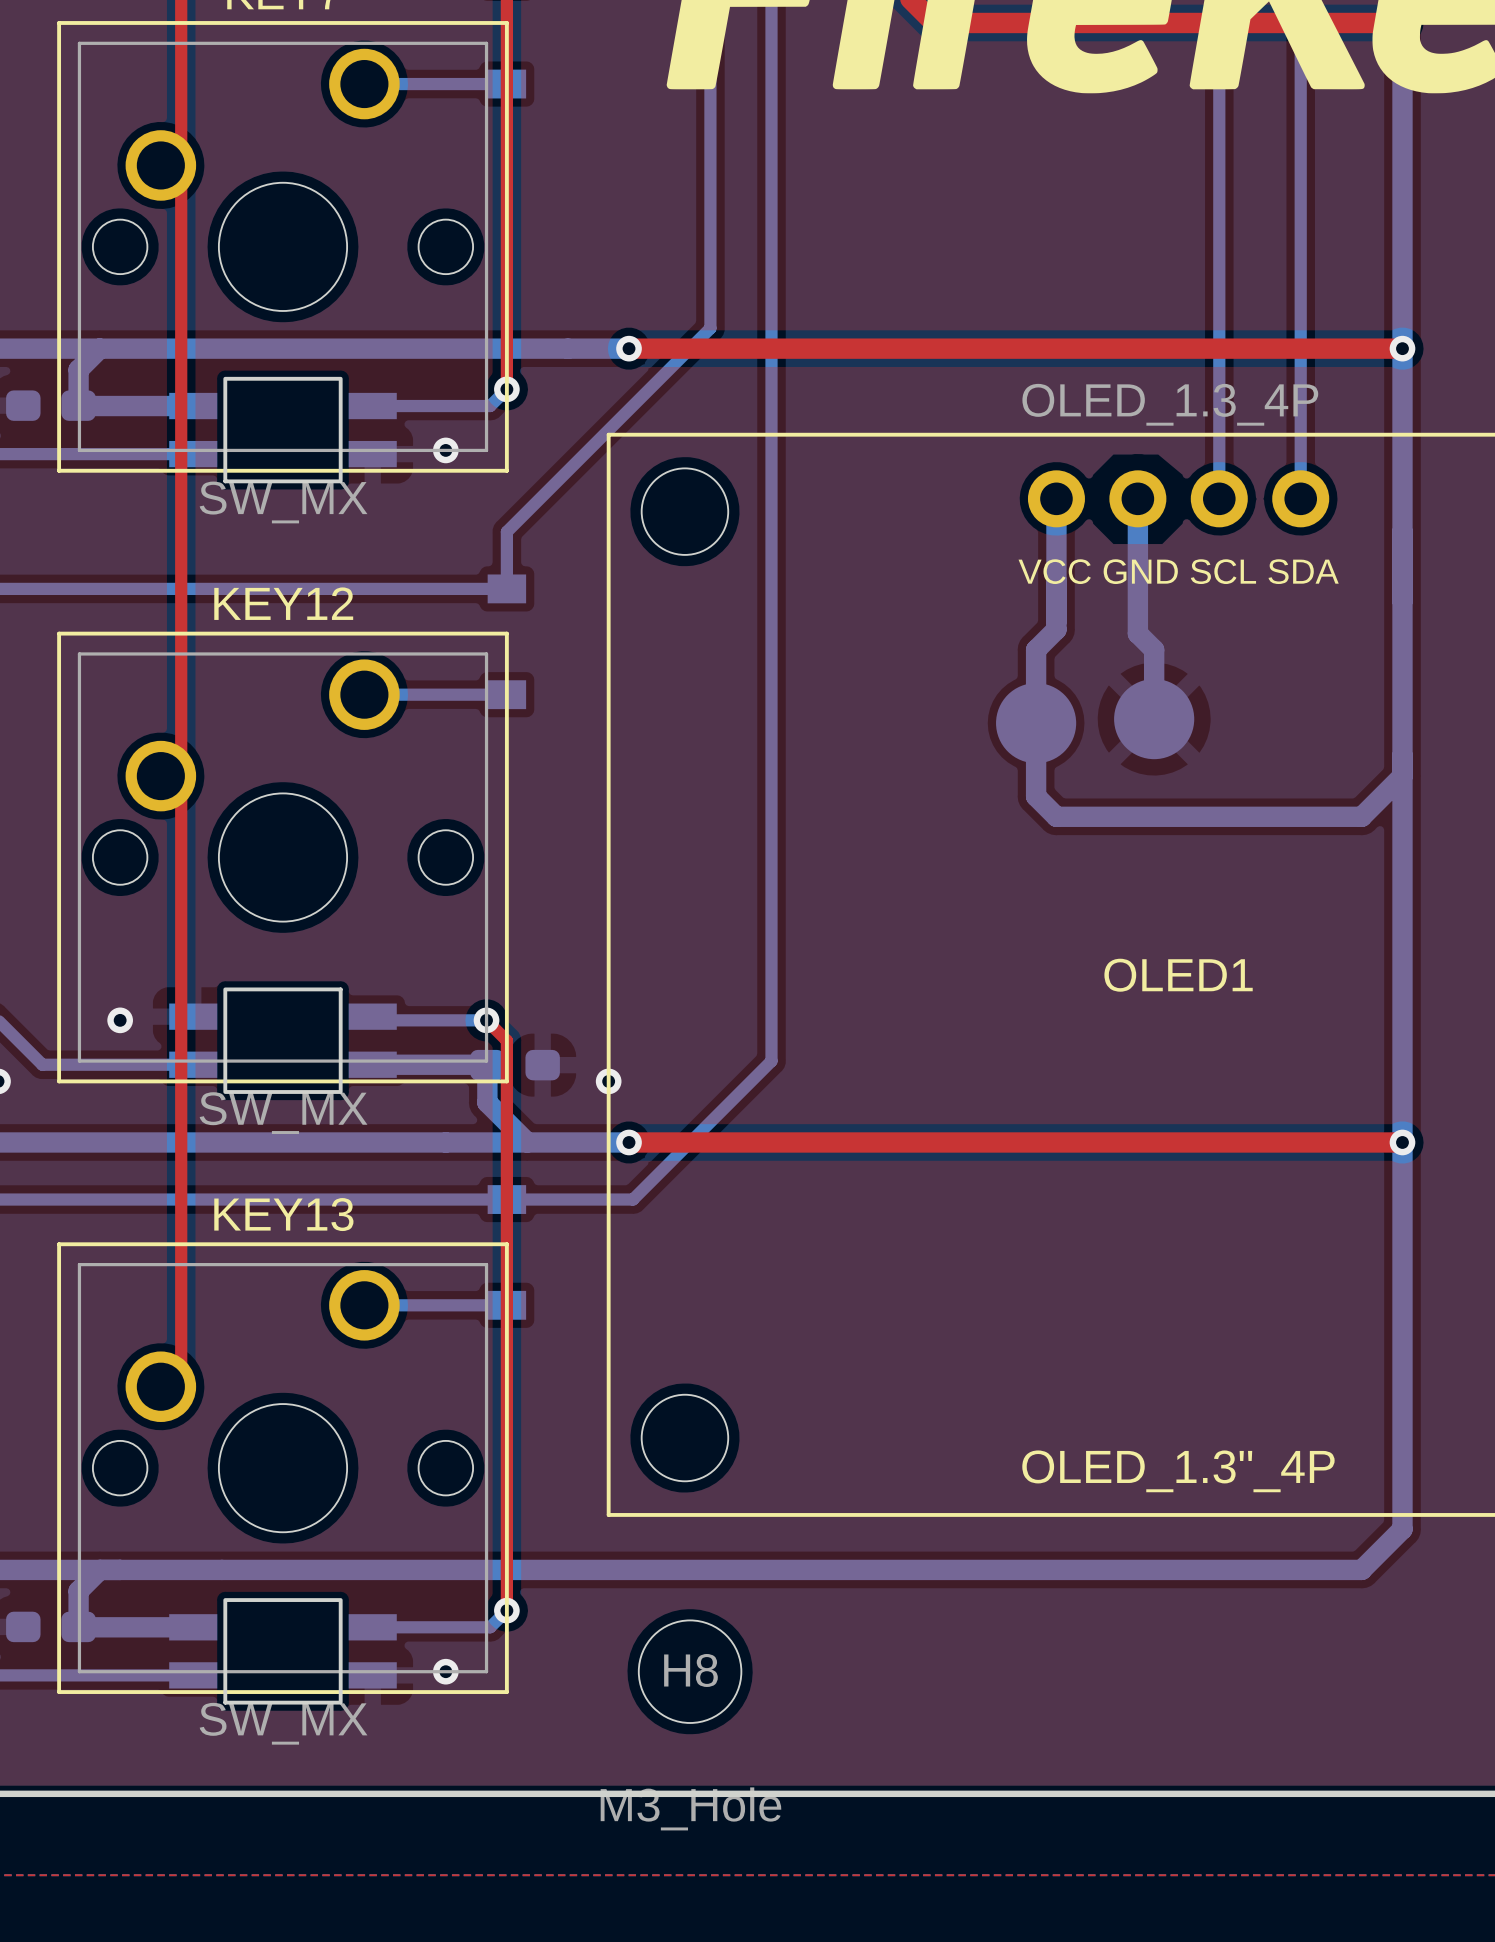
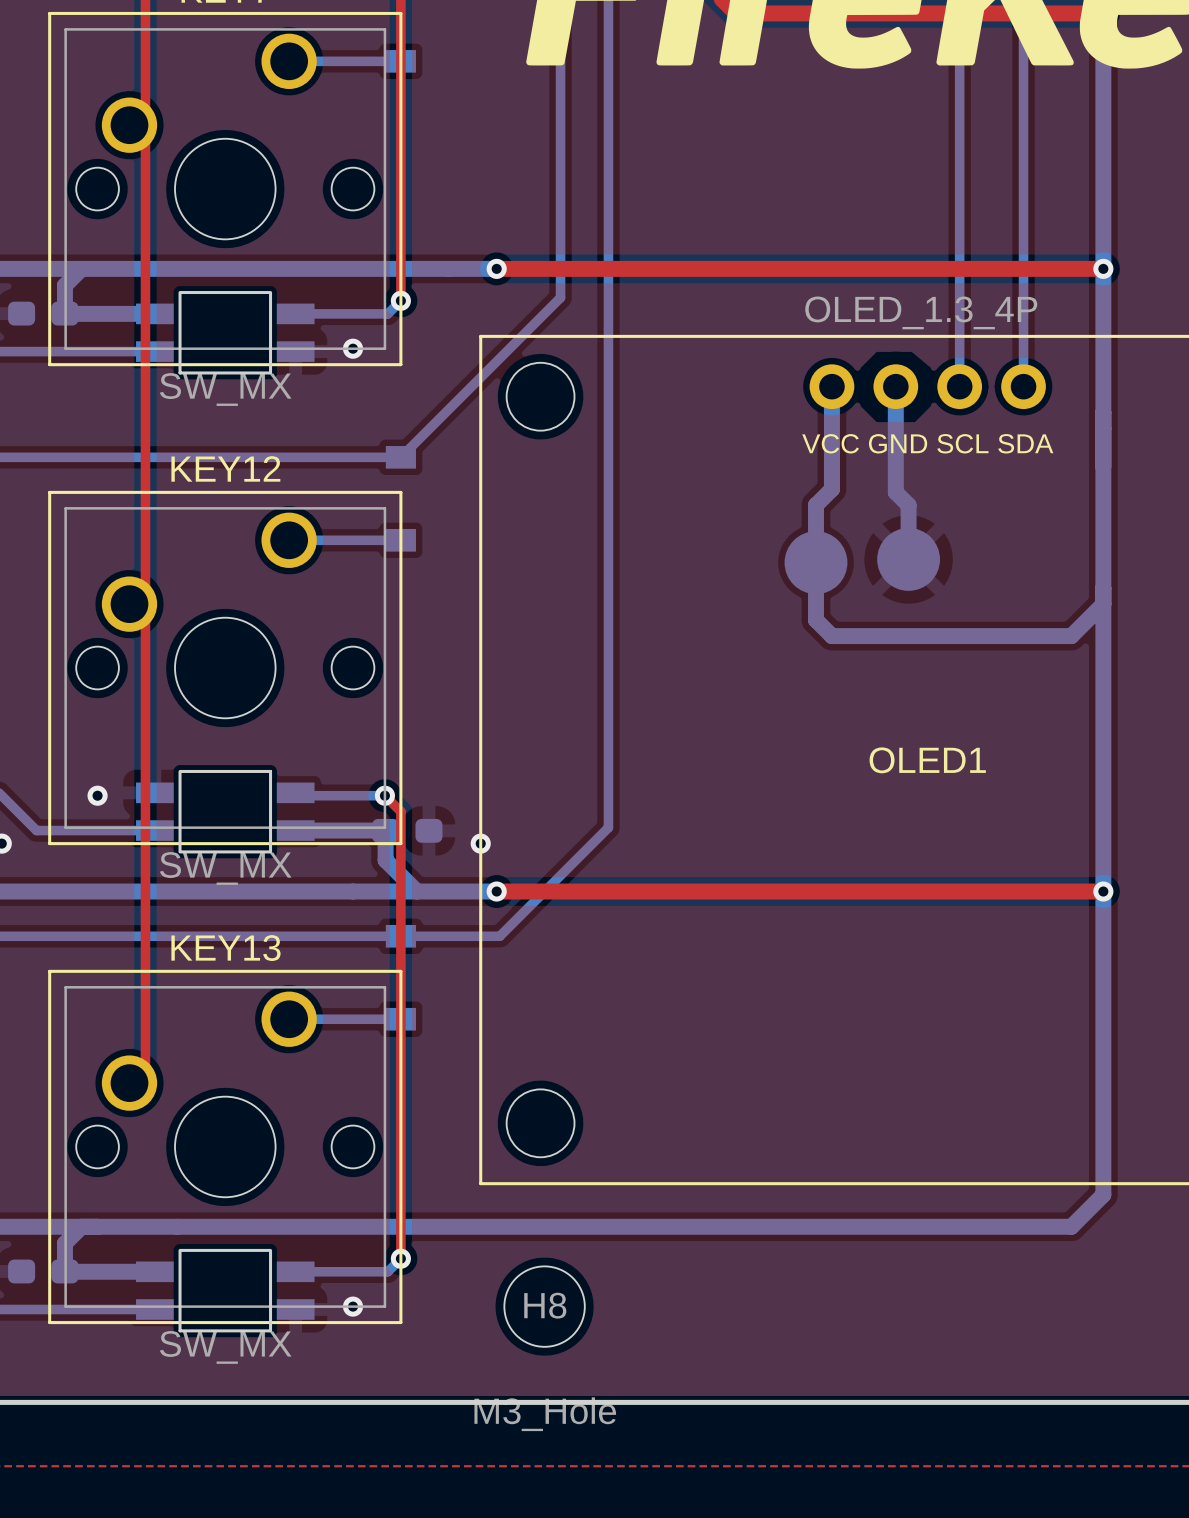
bottom track: (710, 328) (506, 531) (506, 588) -> (560, 252) (560, 297) (400, 457)
OLED1 text: OLED_1.3"_4P (1178, 1471) -> none

